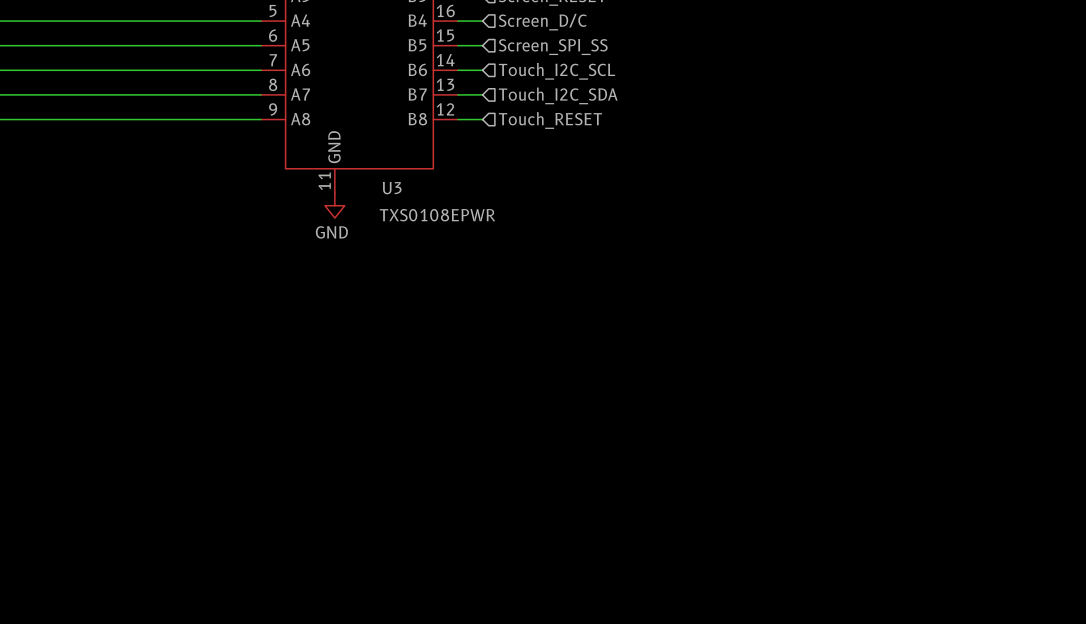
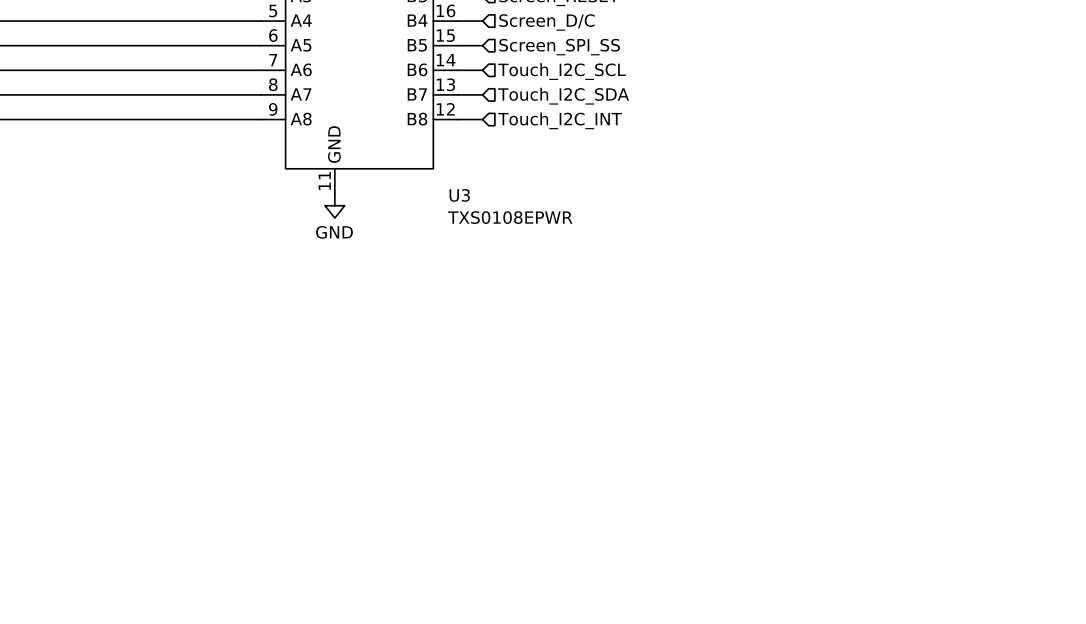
hierarchical label: Touch_RESET (550, 120) -> Touch_I2C_INT (560, 120)
U3 name position: U3 (392, 188) -> U3 (459, 195)
U3 value position: TXS0108EPWR (437, 215) -> TXS0108EPWR (510, 217)

